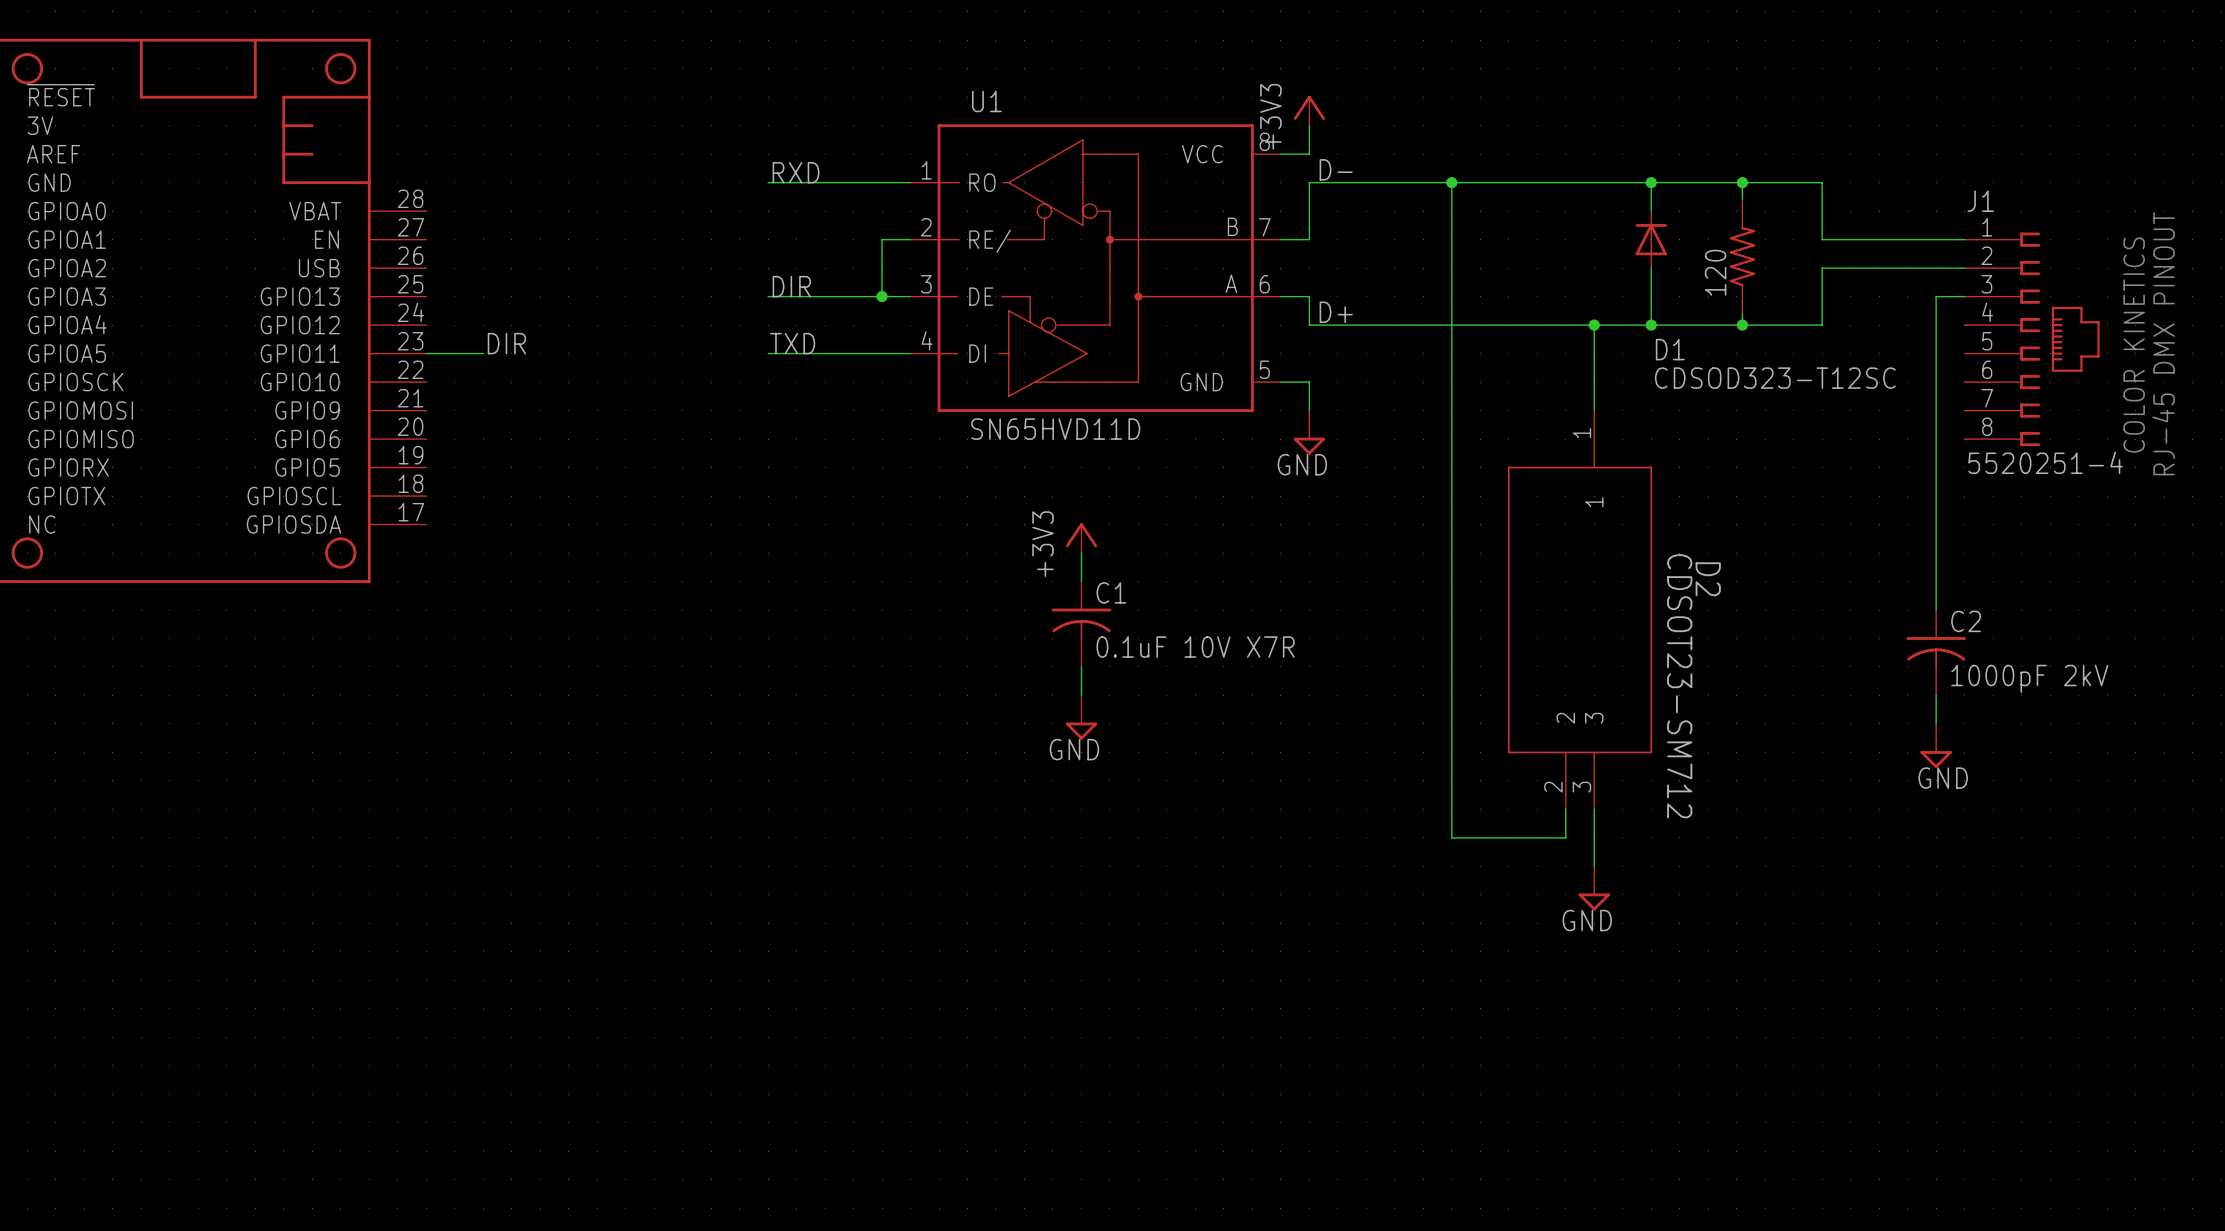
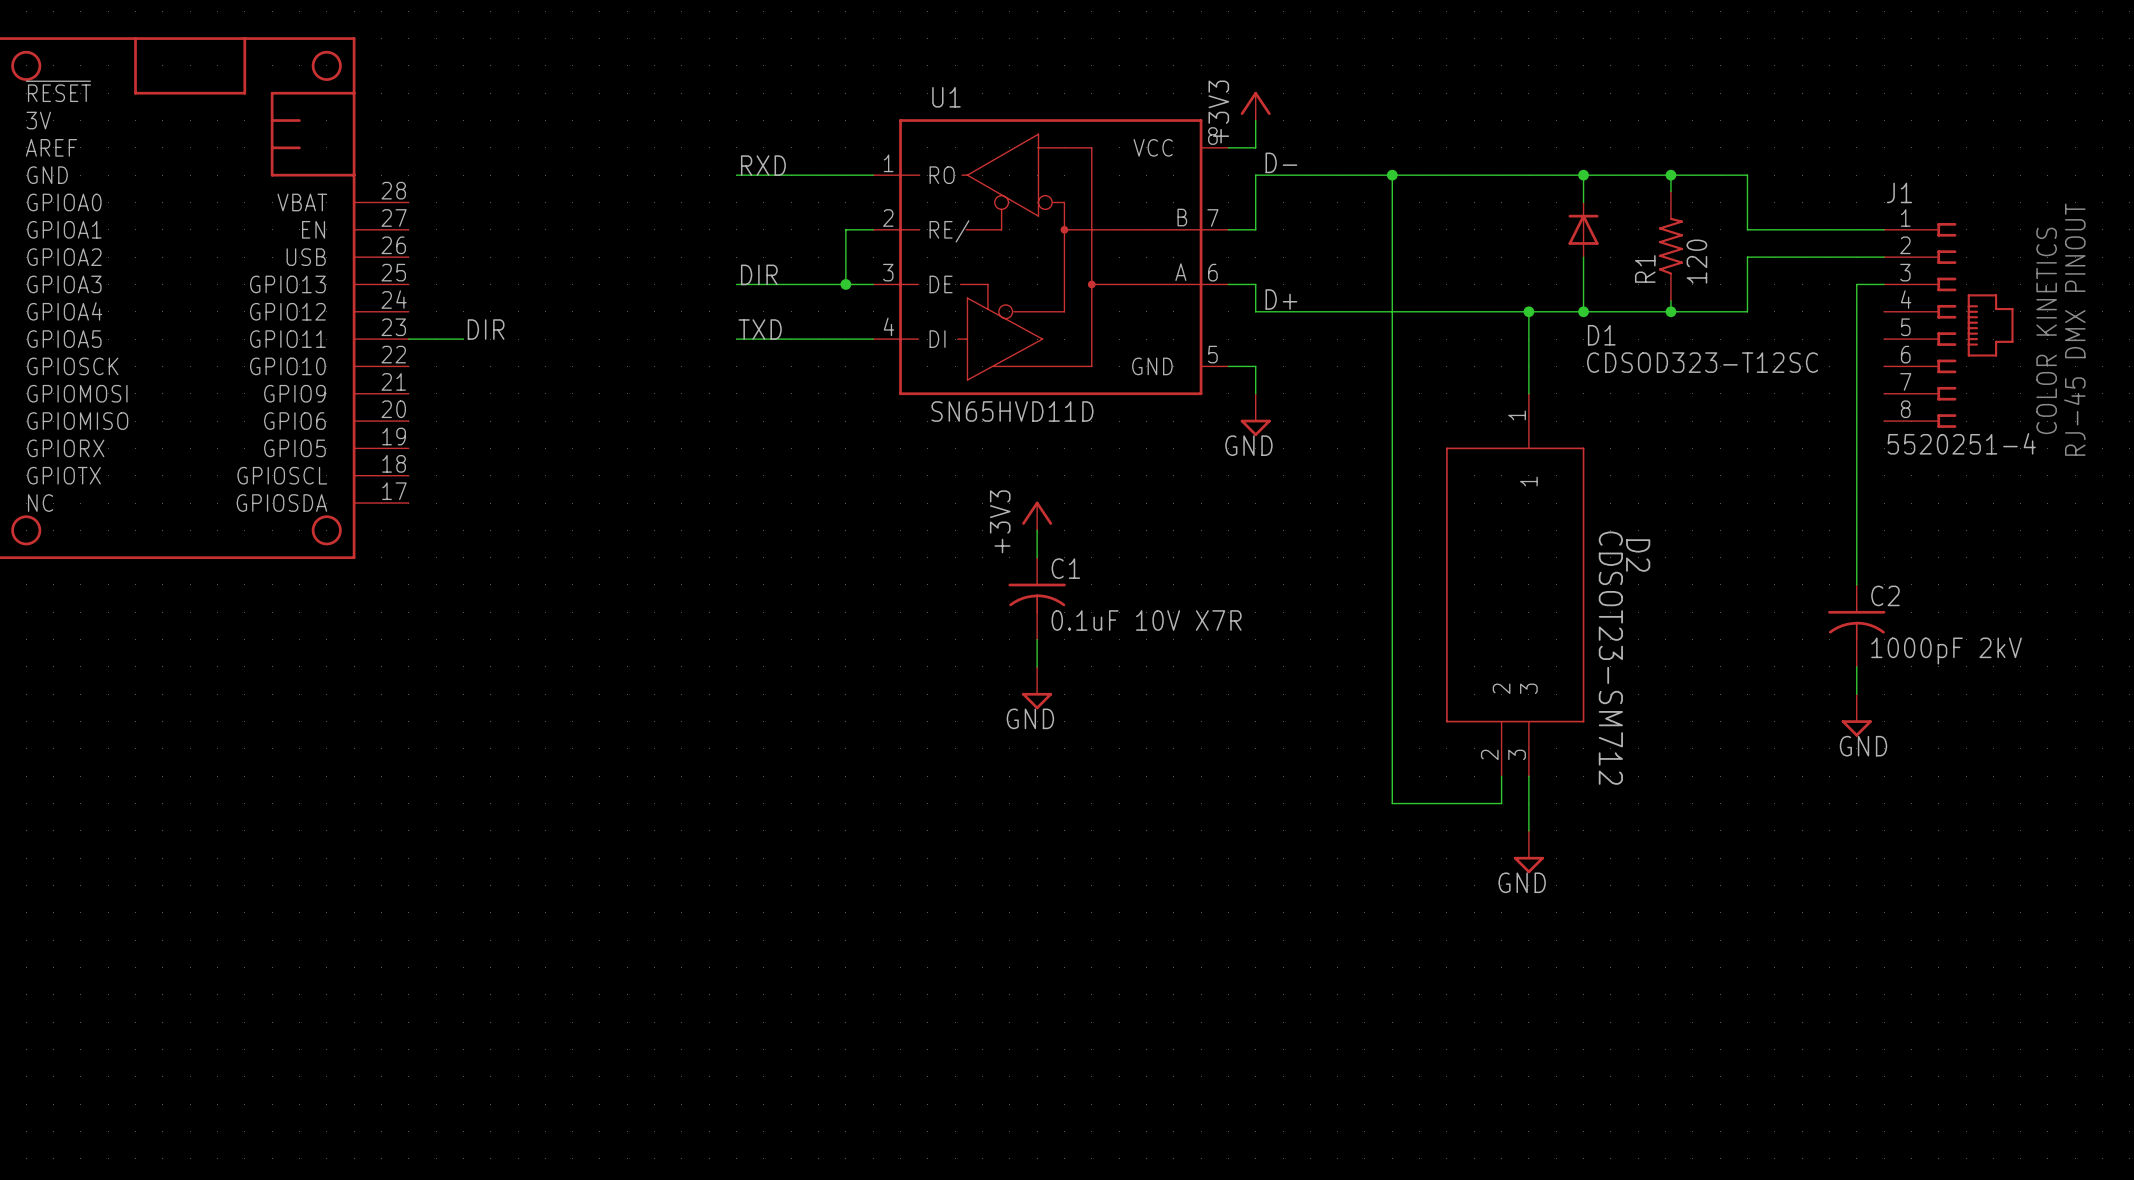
120 name: 120 (1715, 272) -> R1 (1645, 268)
120 value: none -> 120 (1696, 261)

